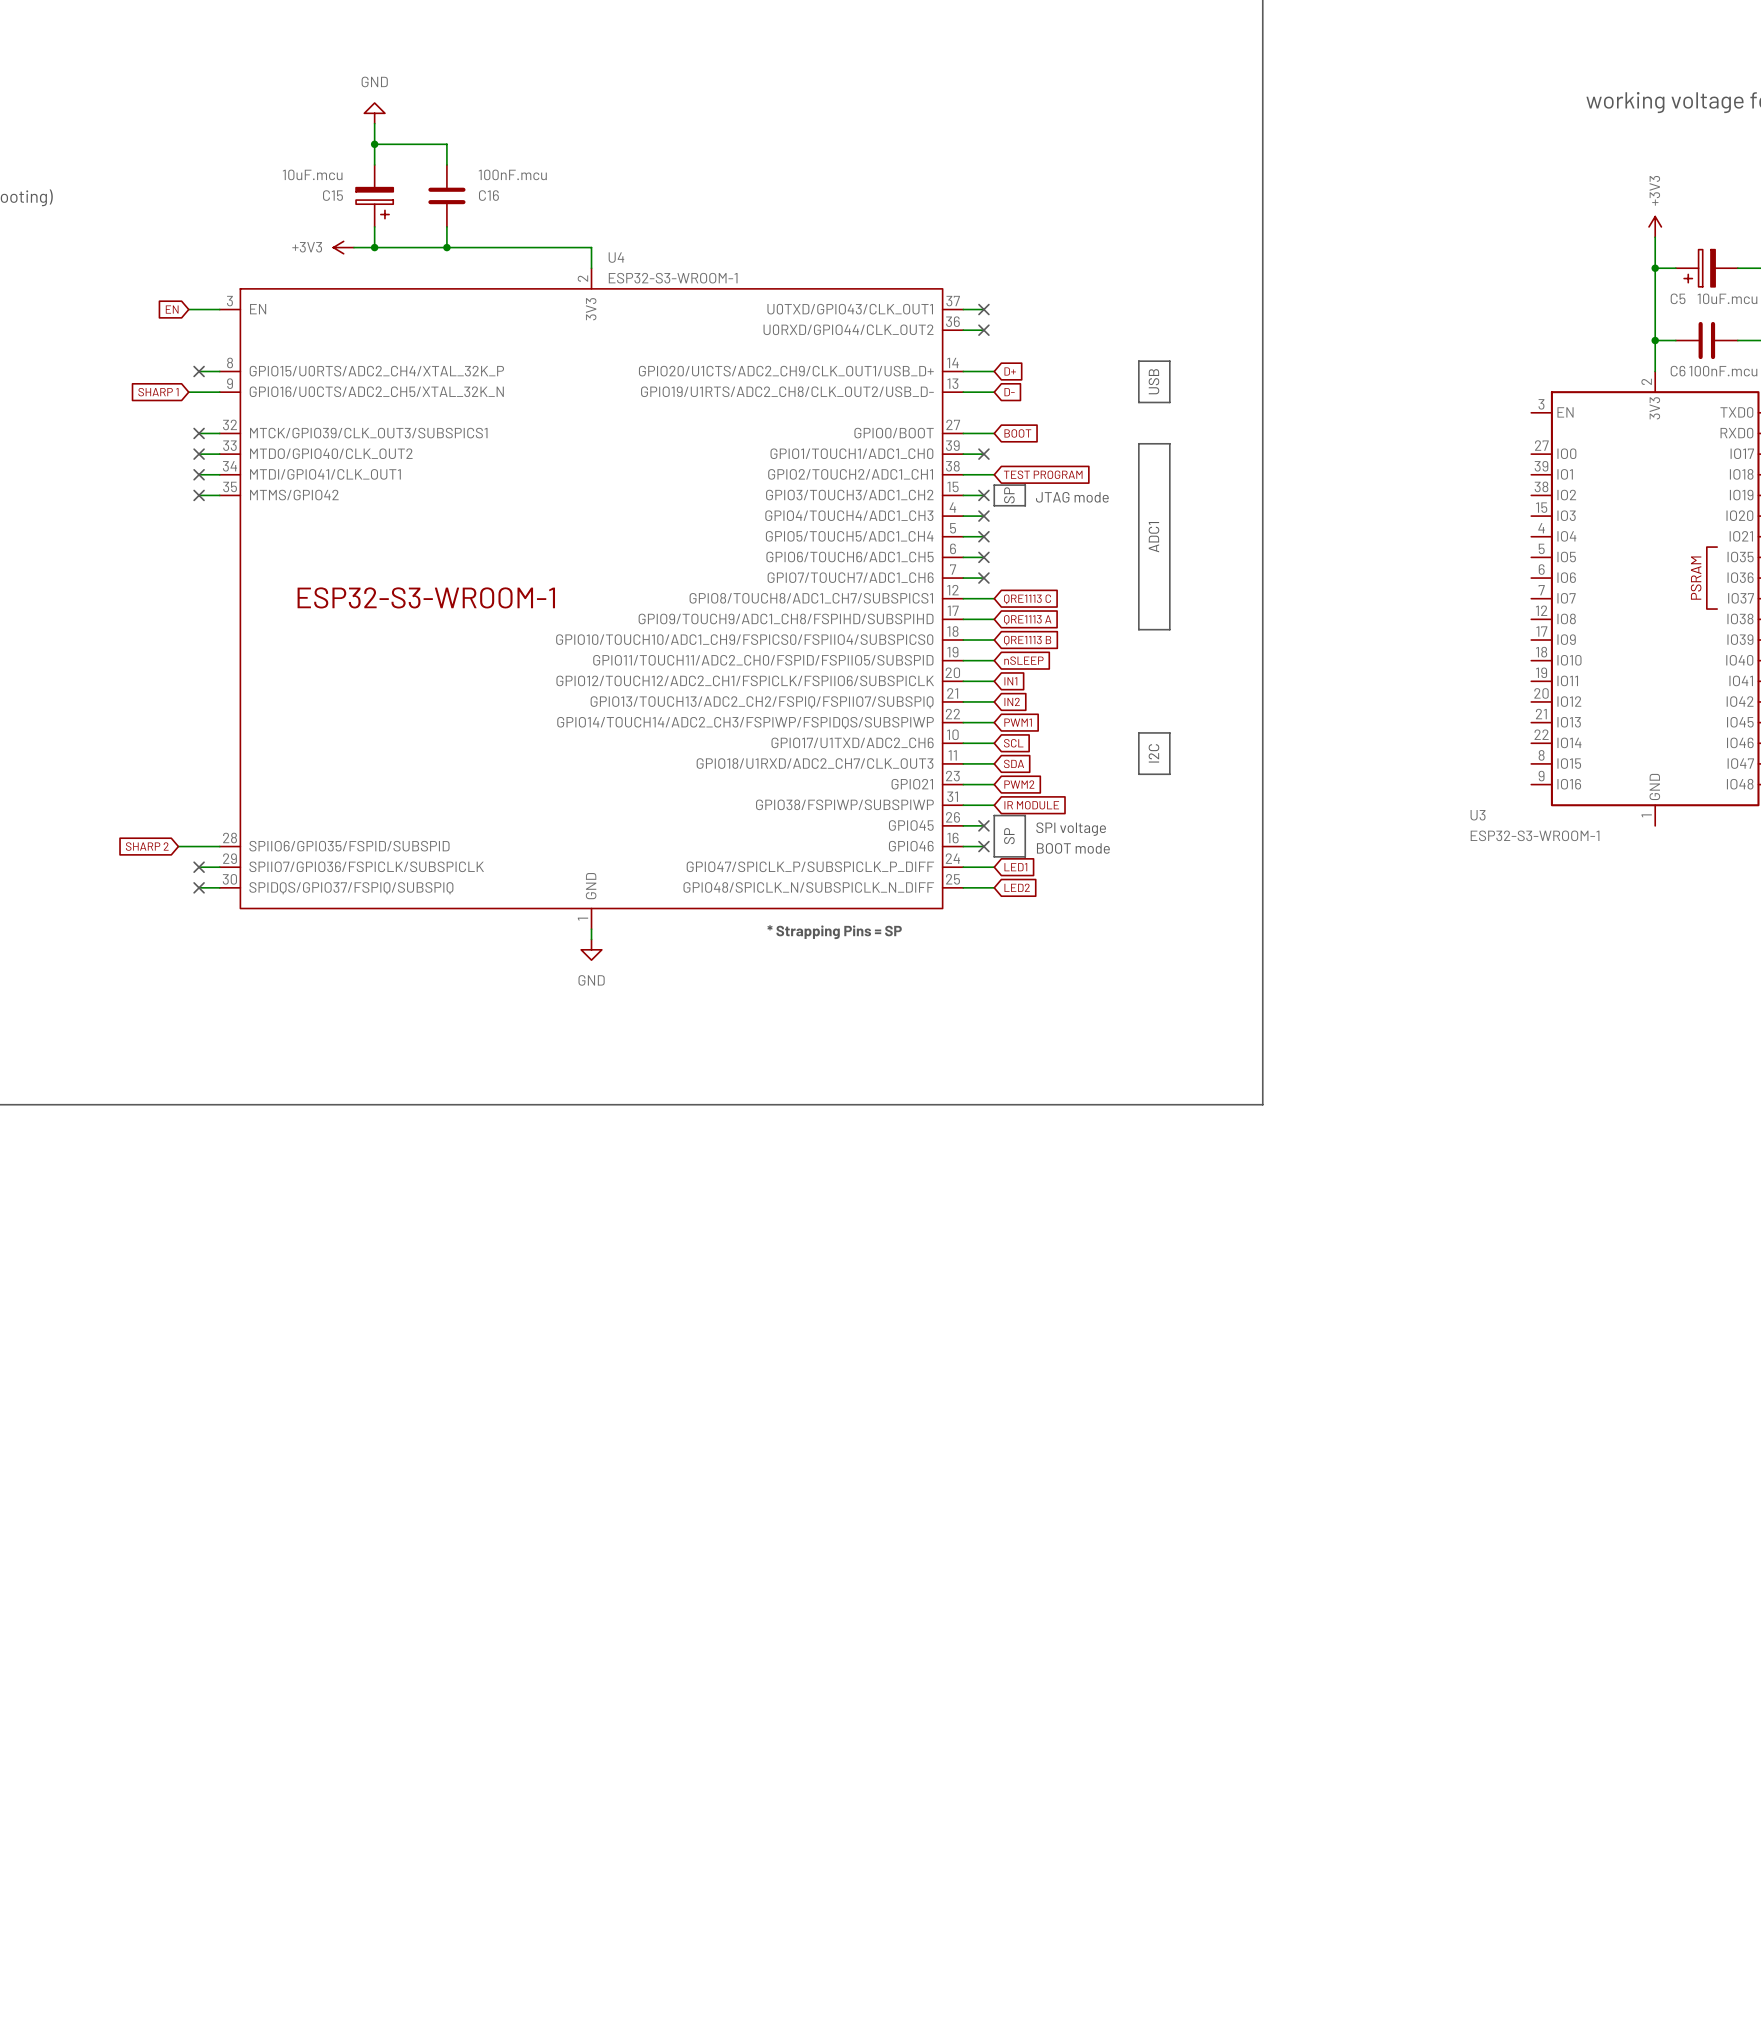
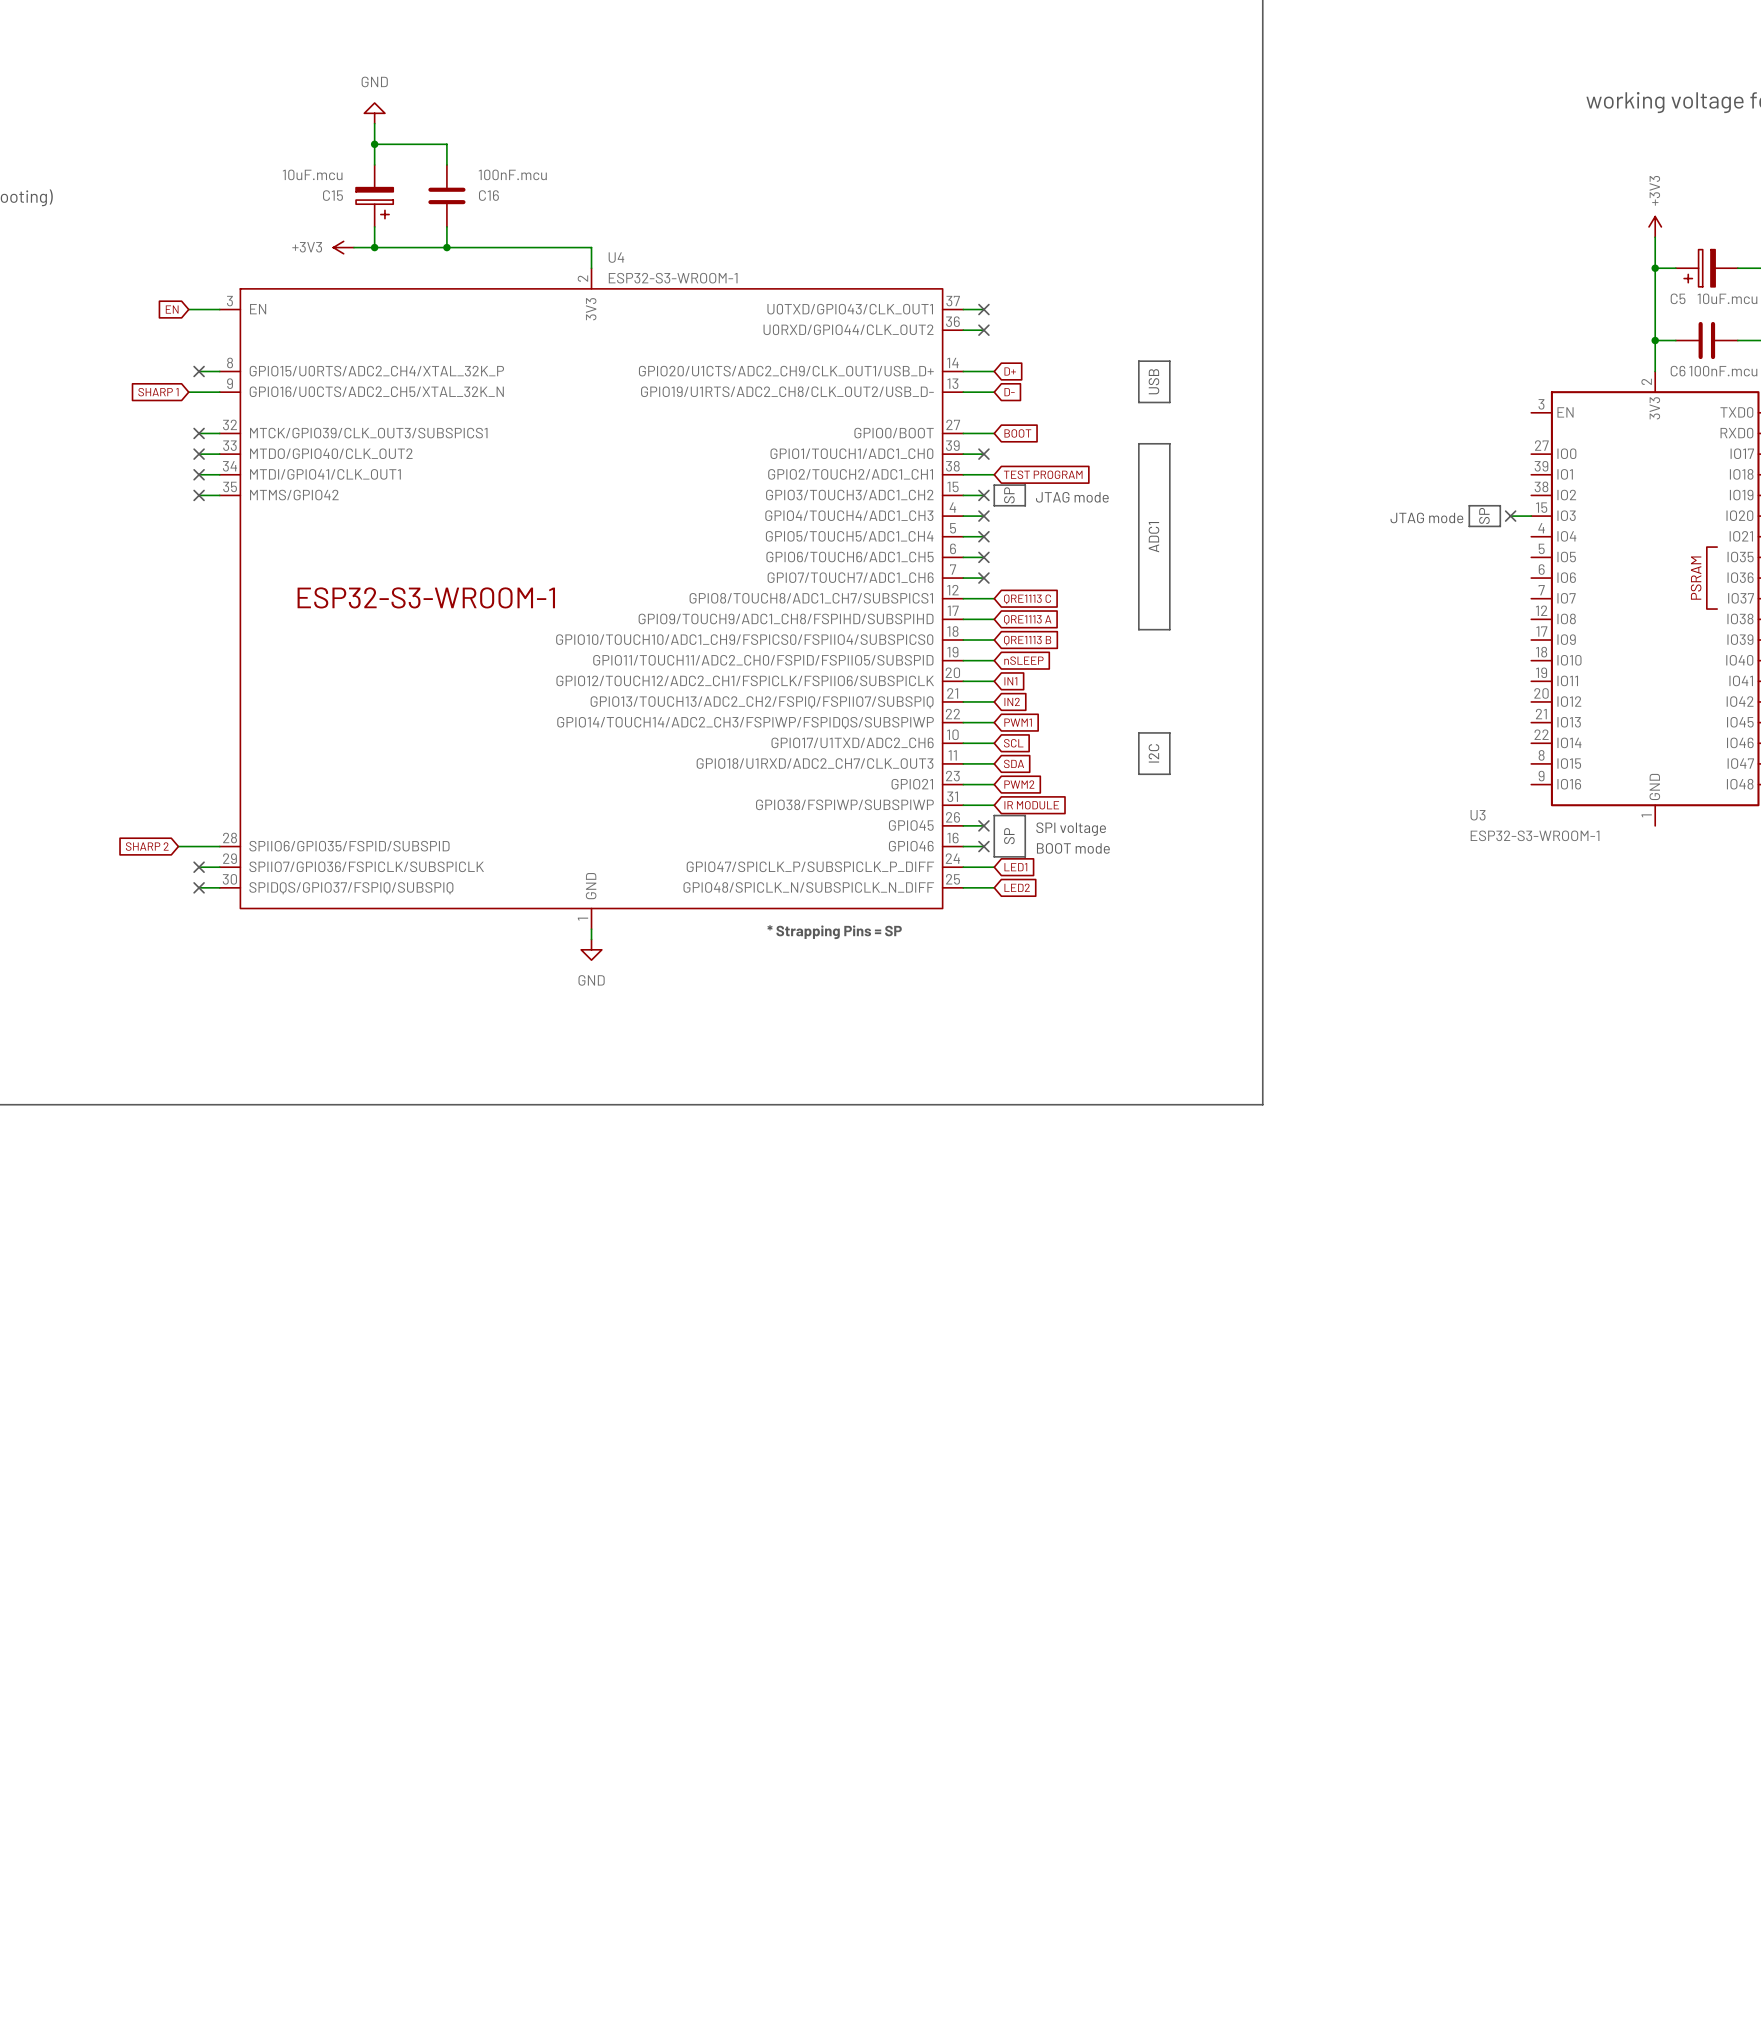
line: none -> (1469, 505) (1500, 505) (1500, 526) (1469, 526) (1469, 505)
text: none -> SP (1484, 515)
wire: none -> (1510, 516) (1531, 516)
no-connect mark: none -> (1510, 516)
text: none -> JTAG mode (1426, 517)

